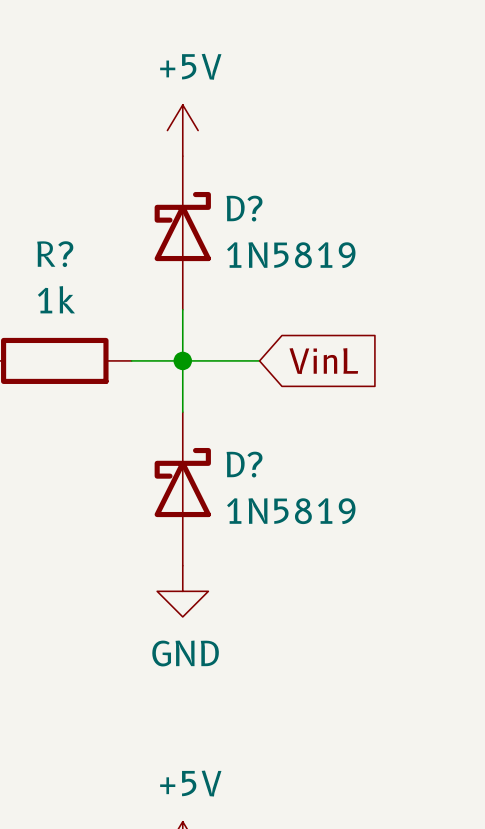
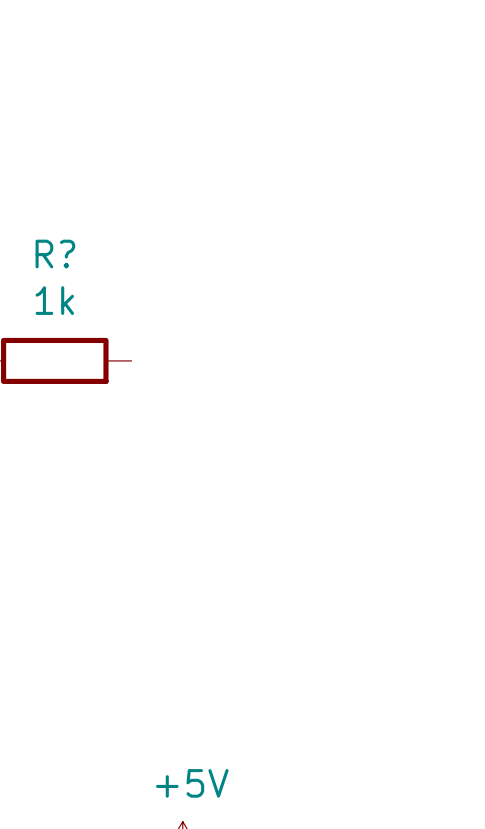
power symbol: +5V (182, 130) -> none
D?: 1N5819 (182, 232) -> none
wire: (182, 309) (182, 412) -> none
wire: (131, 360) (259, 360) -> none
junction: (182, 360) -> none
global label: VinL (323, 361) -> none
D?: 1N5819 (182, 488) -> none
power symbol: GND (182, 591) -> none

